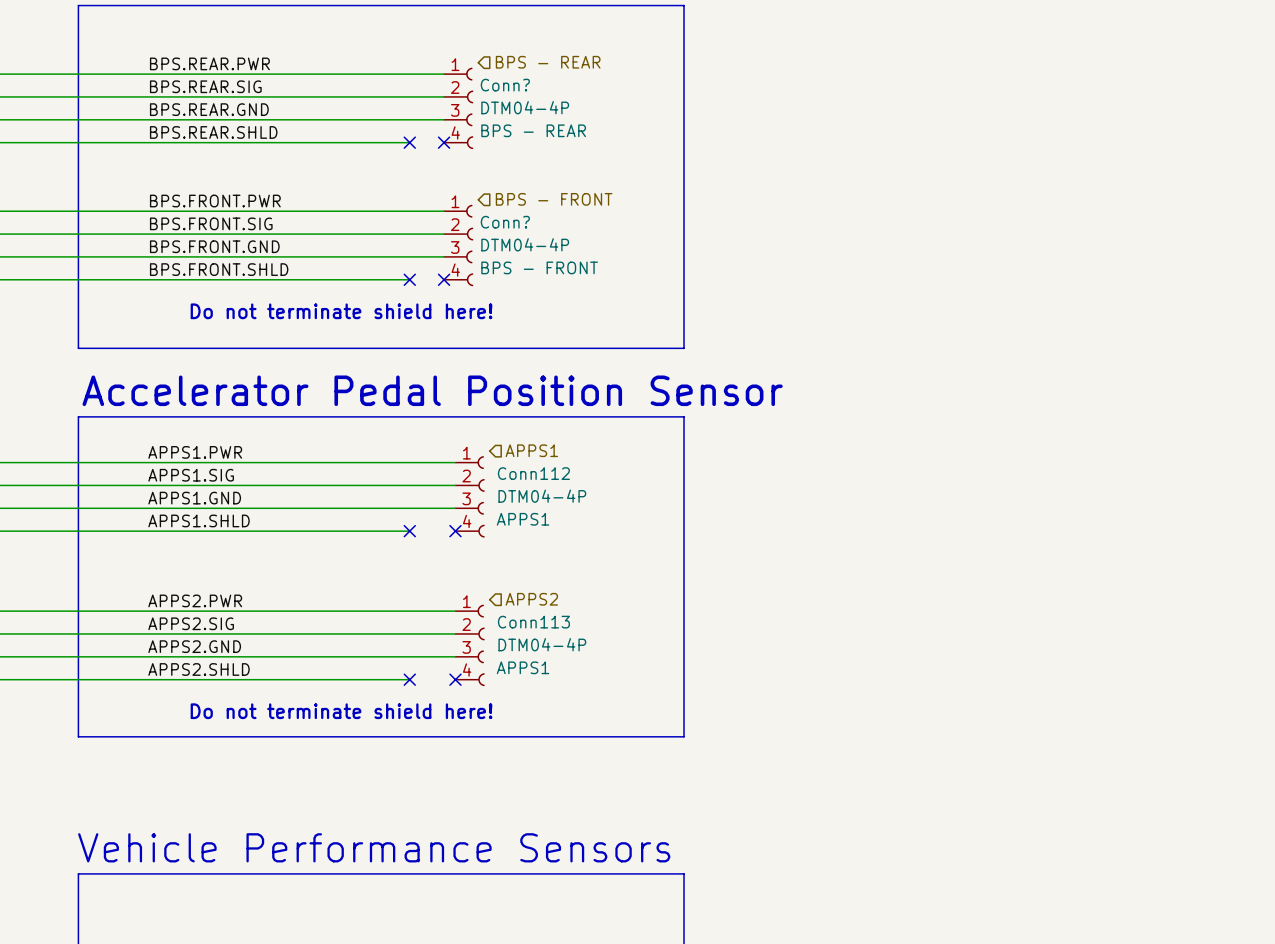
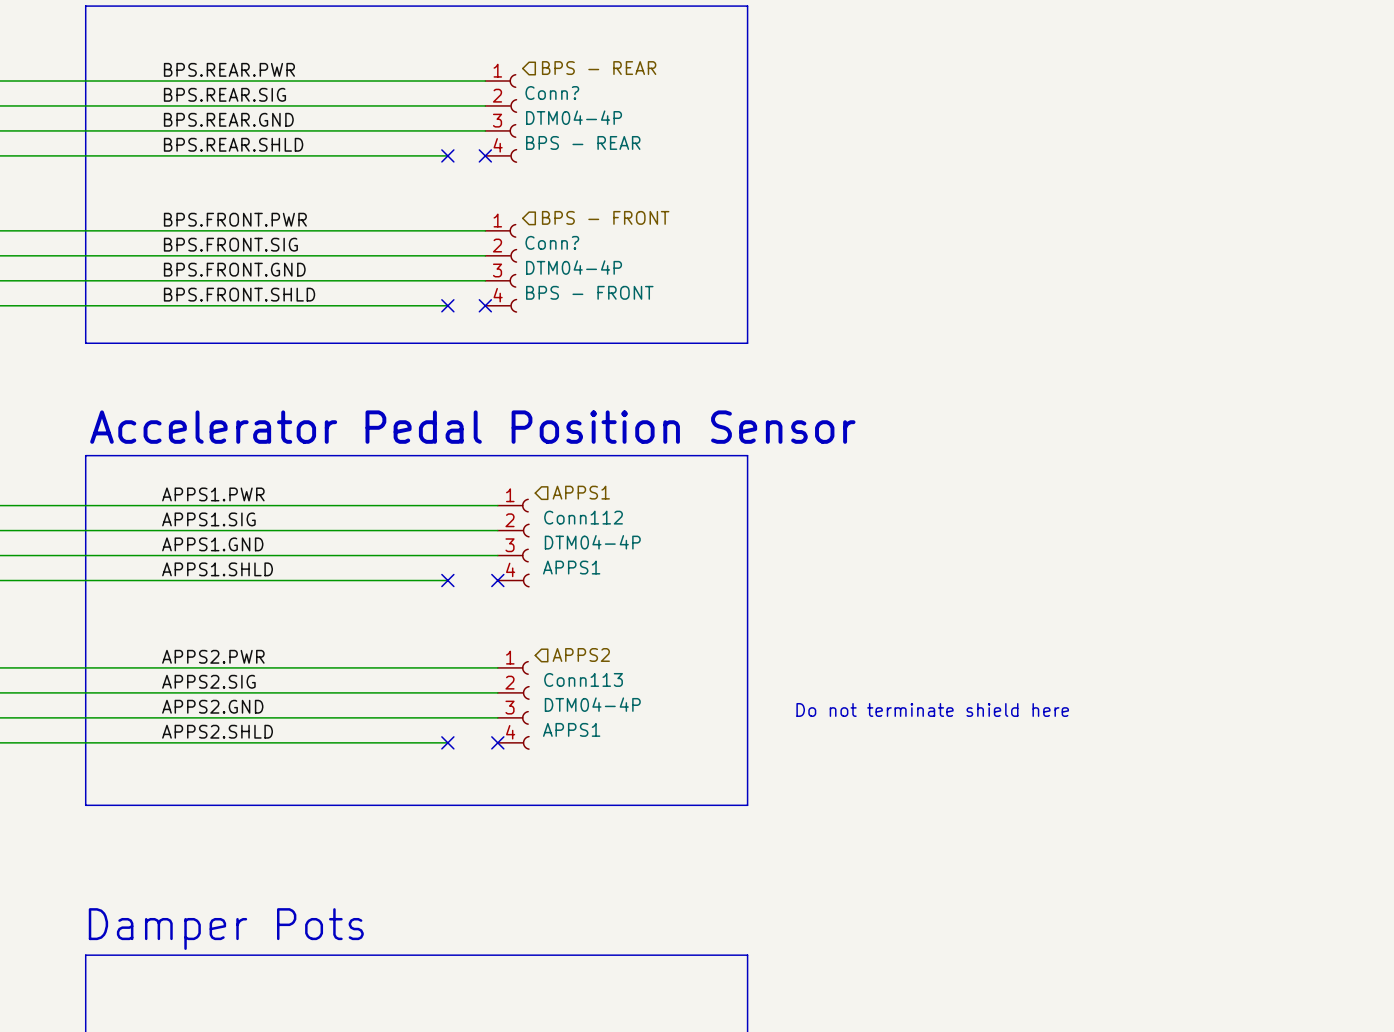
text: Do not terminate shield here! (341, 311) -> none
line: (78, 314) (78, 348) (684, 348) (684, 314) -> (85, 343) (747, 343)
text: none -> Do not terminate shield here (932, 709)
text: Do not terminate shield here! (341, 711) -> none
text: Vehicle Performance Sensors (374, 847) -> none
text: none -> Damper Pots (226, 929)

